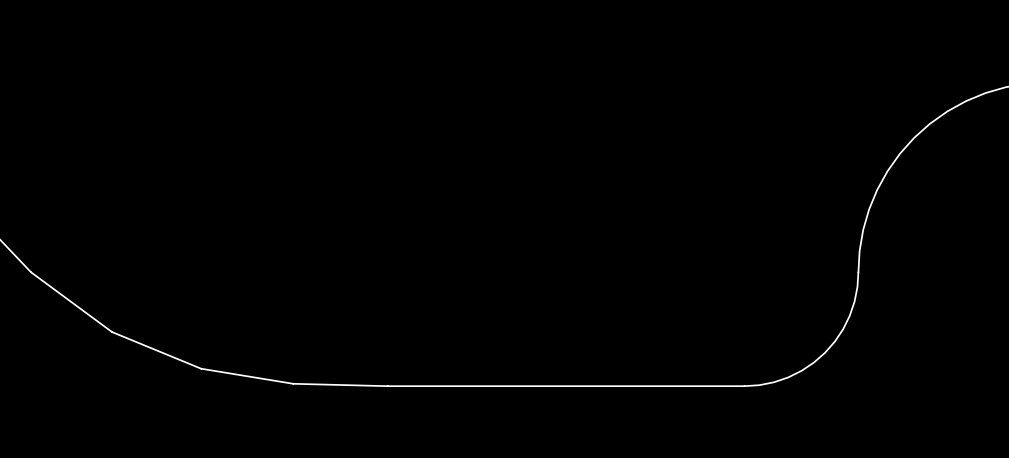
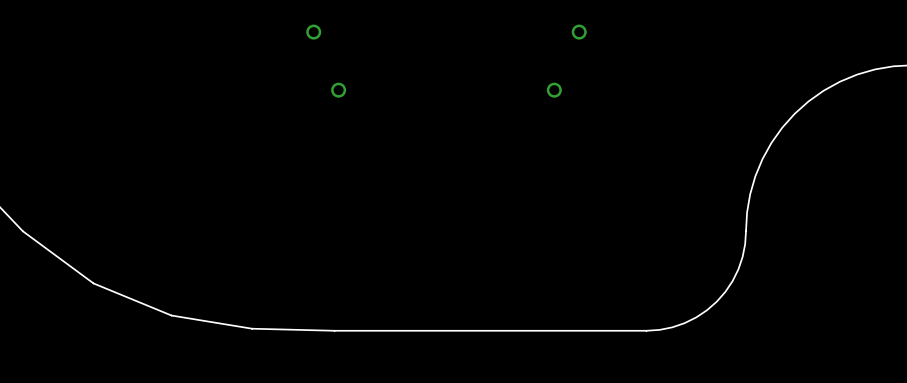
via: none -> (313, 32)
via: none -> (579, 32)
via: none -> (338, 90)
via: none -> (554, 90)

